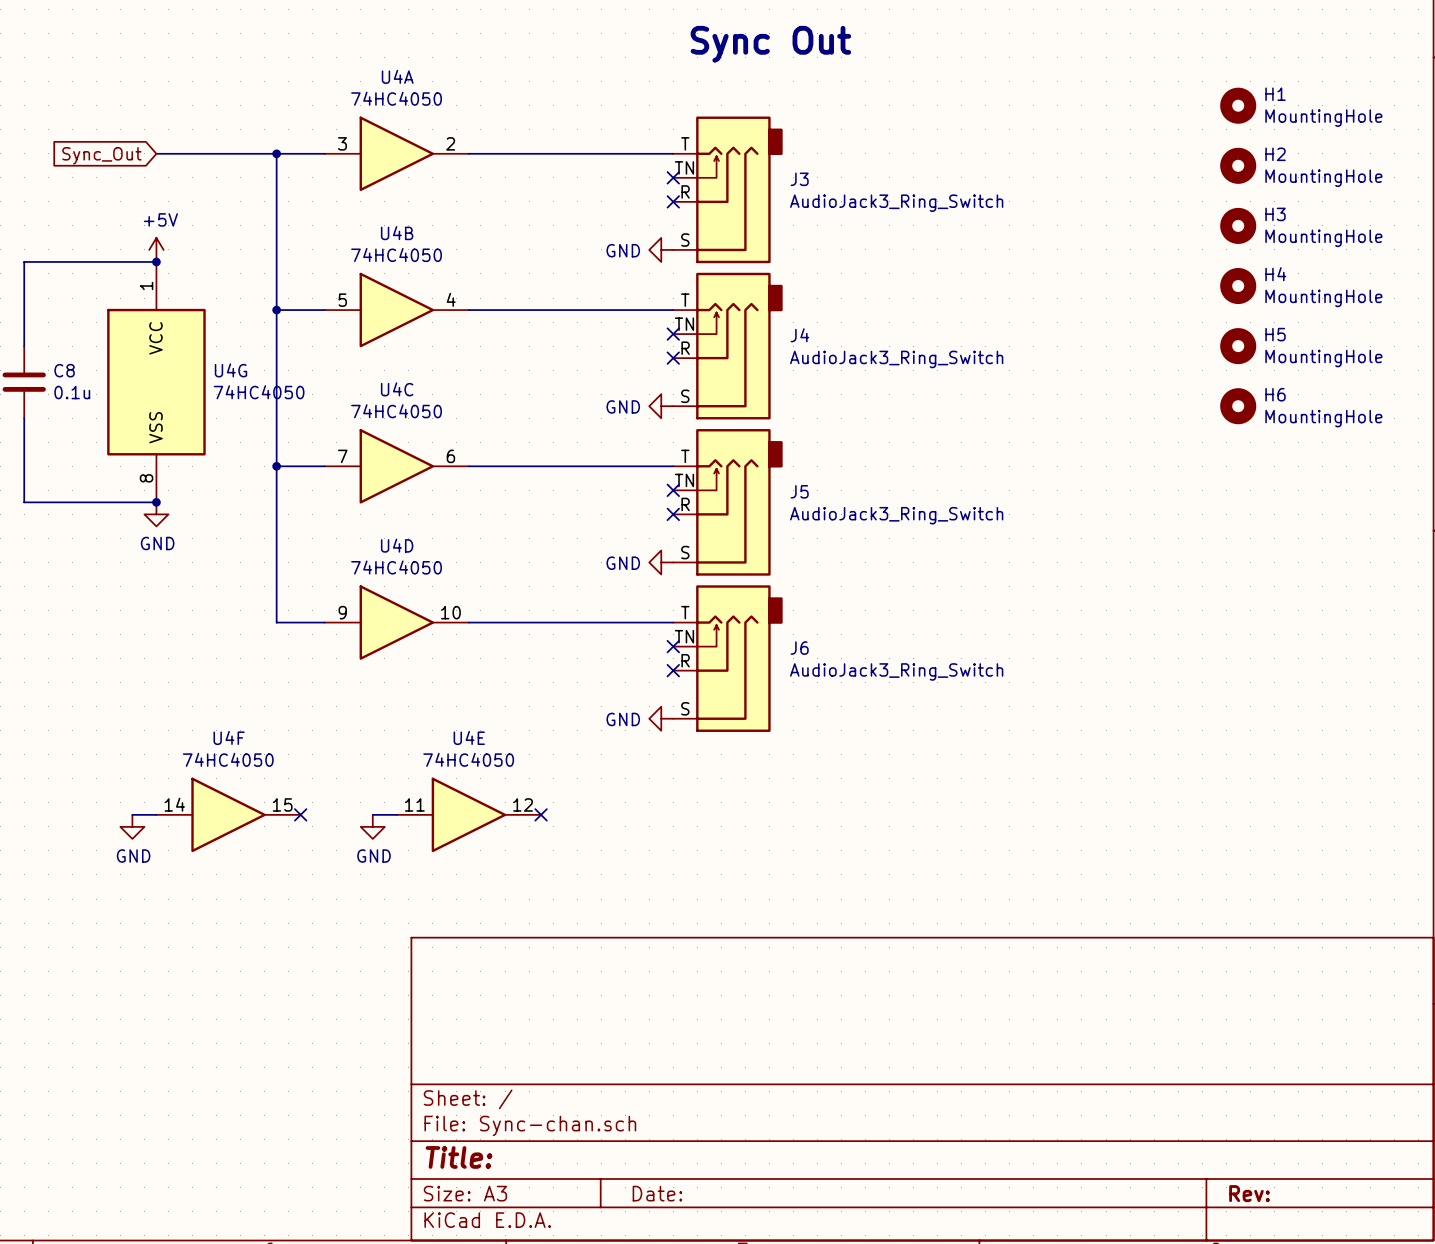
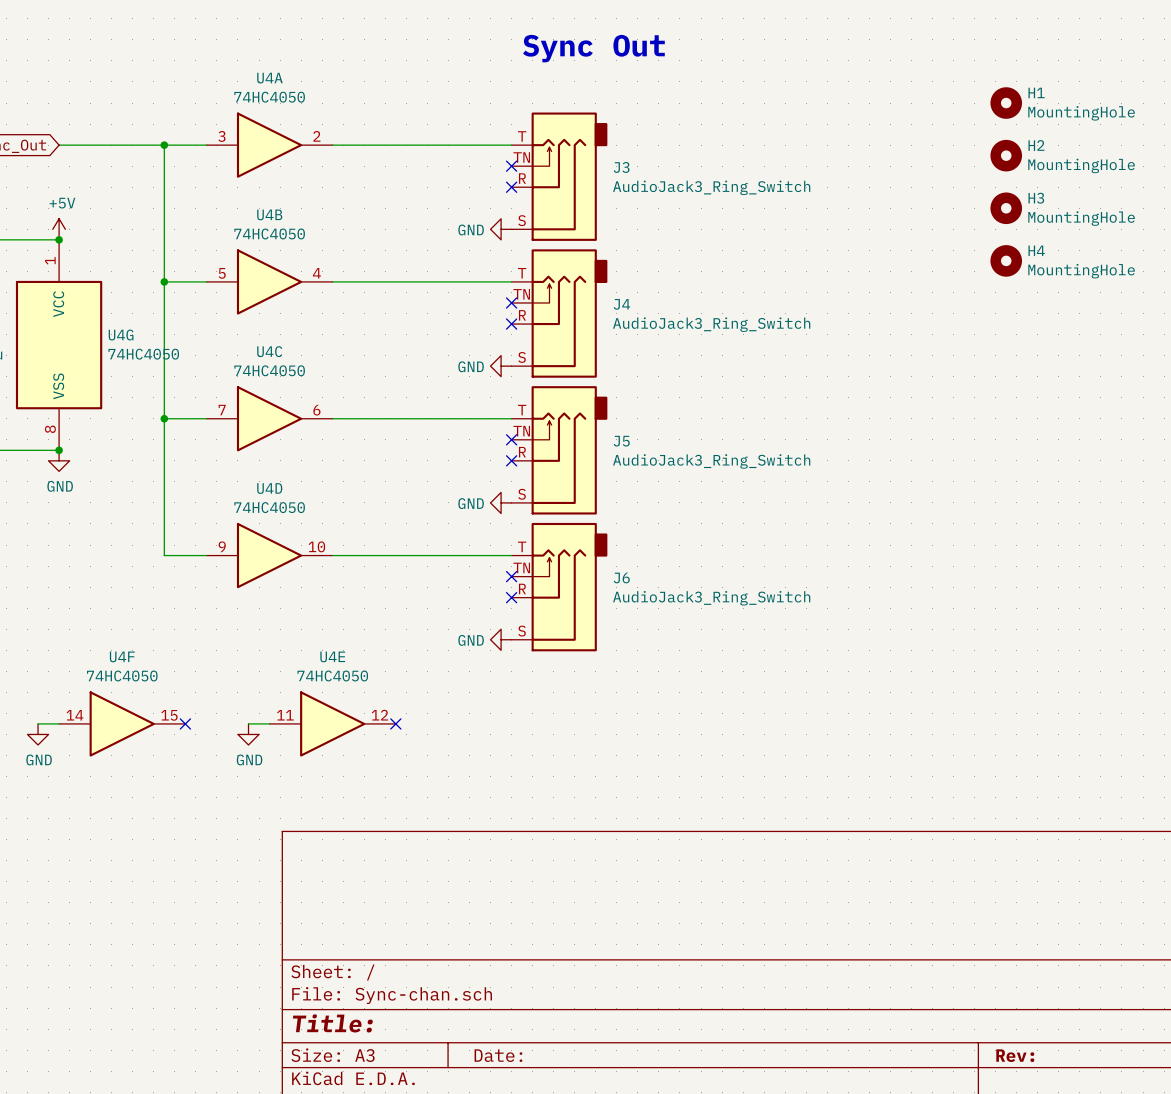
H5: MountingHole (1238, 346) -> none
H6: MountingHole (1238, 406) -> none

